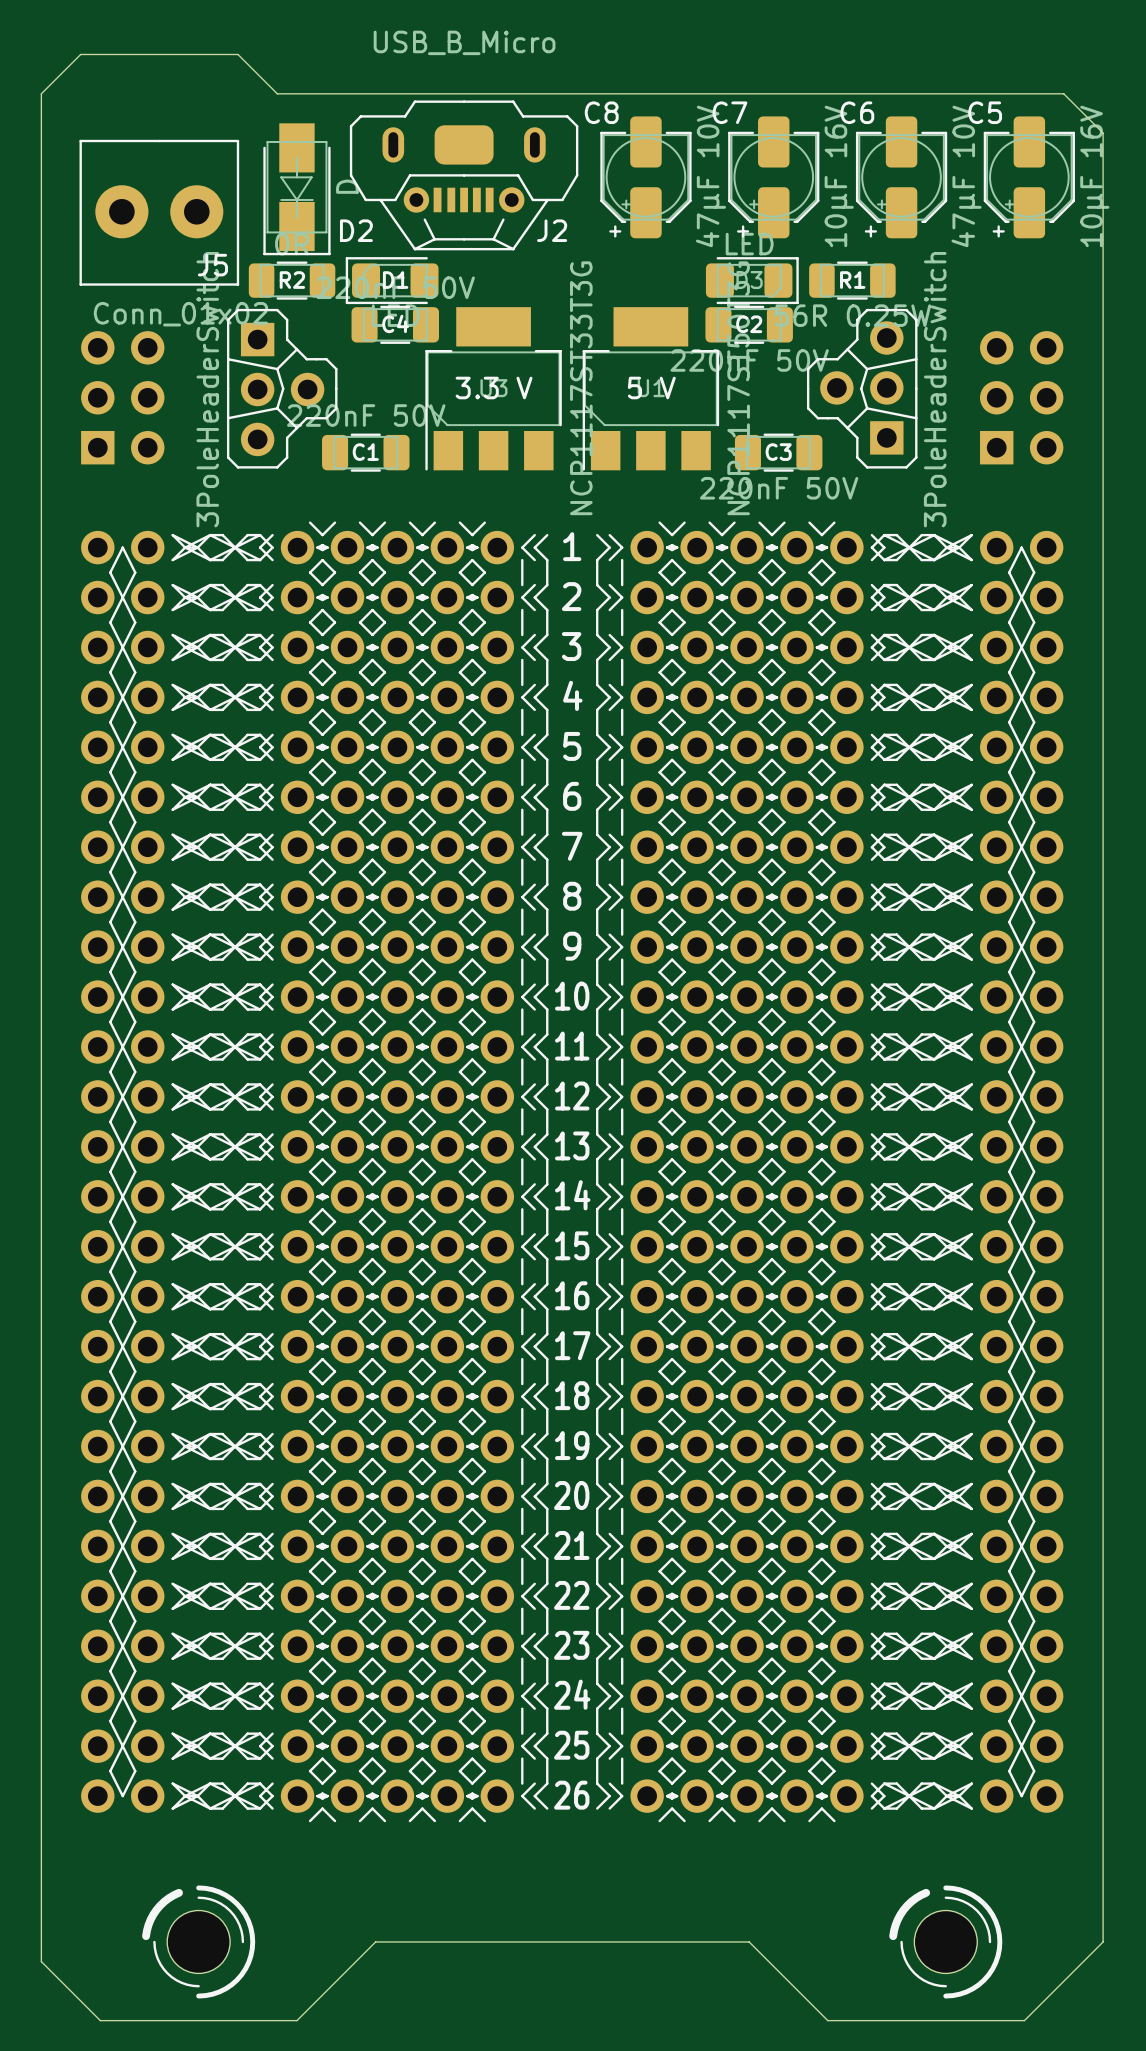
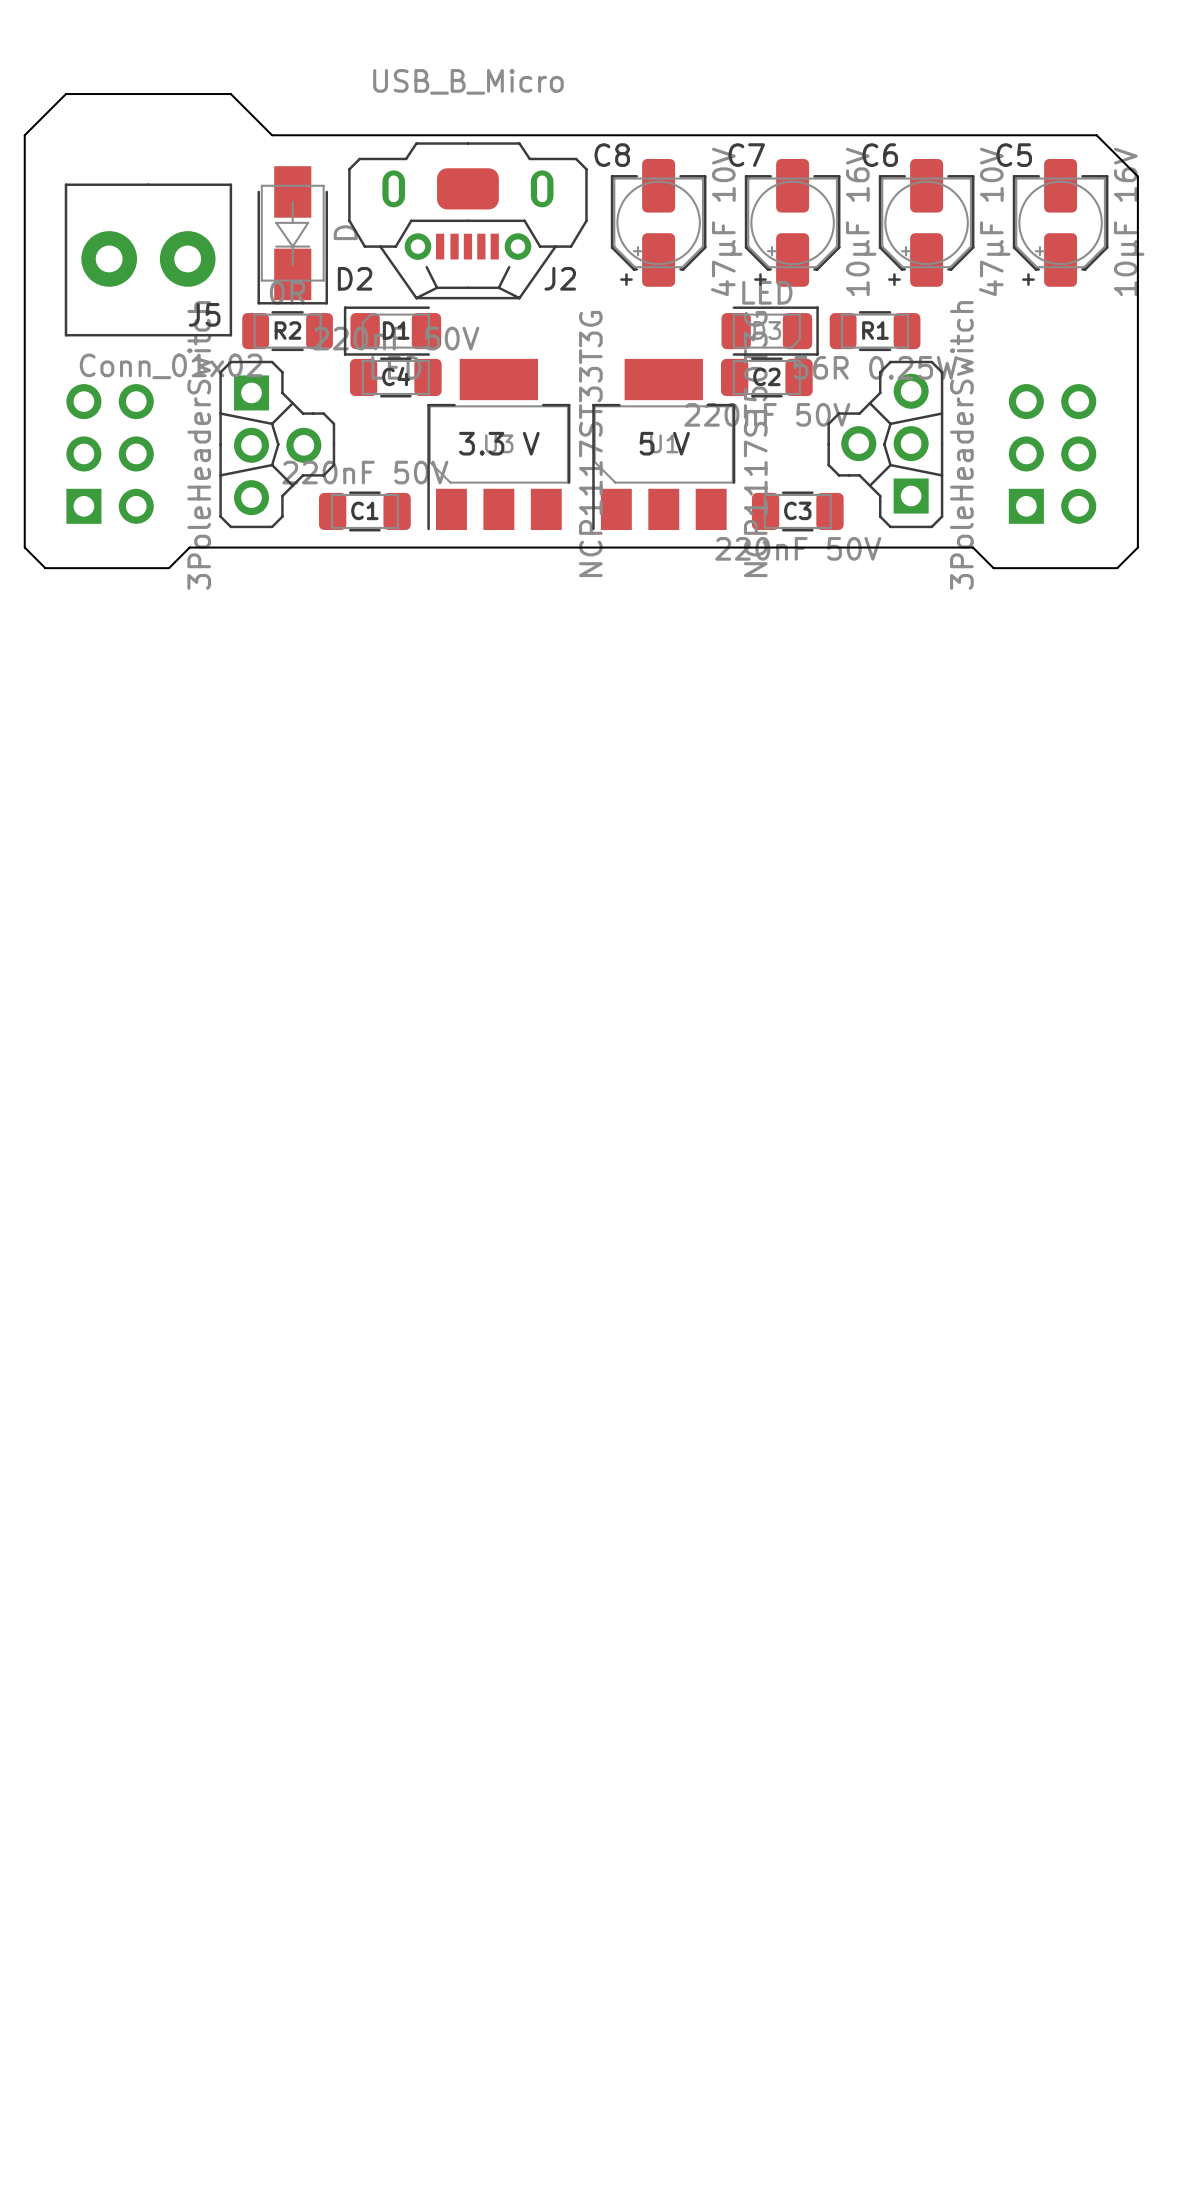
board edge: (41, 487) (41, 1961) (100, 2020) (296, 2020) (375, 1941) (749, 1941) (827, 2020) (1024, 2020) (1103, 1941) (1103, 487) -> (24, 547) (45, 568) (169, 568) (189, 547) (972, 547) (993, 568) (1117, 568) (1137, 547)
part: (572, 1171) -> none
line: (198, 1887) (219, 1892) (236, 1903) (248, 1921) (252, 1941) (248, 1962) (236, 1980) (219, 1991) (198, 1996) -> none
line: (945, 1887) (966, 1892) (984, 1903) (995, 1921) (999, 1941) (995, 1962) (984, 1980) (966, 1991) (945, 1996) -> none
line: (179, 1892) (164, 1901) (156, 1909) (150, 1919) (146, 1936) -> none
line: (926, 1892) (911, 1901) (903, 1909) (895, 1925) (893, 1936) -> none
line: (198, 1897) (215, 1901) (229, 1910) (239, 1925) (242, 1941) -> none
line: (945, 1897) (962, 1901) (977, 1910) (986, 1925) (990, 1941) -> none
line: (154, 1941) (157, 1958) (167, 1973) (181, 1982) (198, 1986) -> none
part: (198, 1941) -> none
line: (901, 1941) (904, 1958) (914, 1973) (928, 1982) (945, 1986) -> none
part: (945, 1941) -> none

